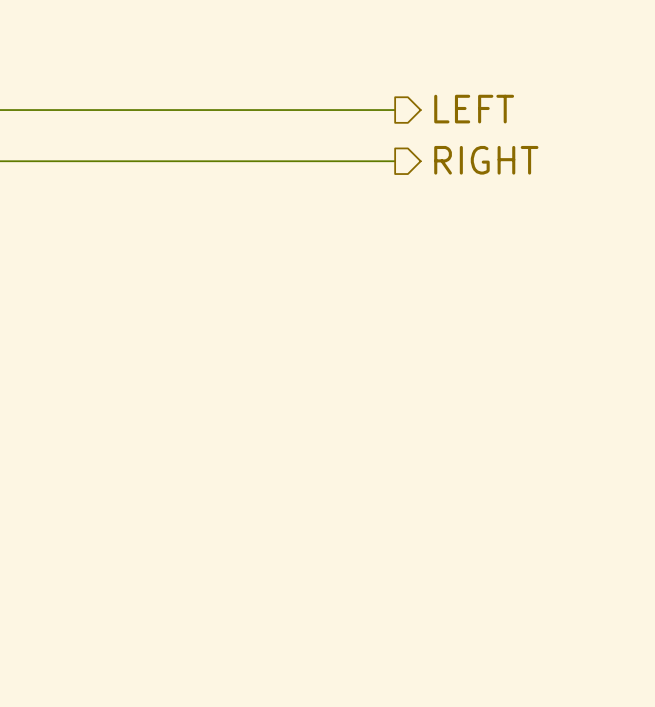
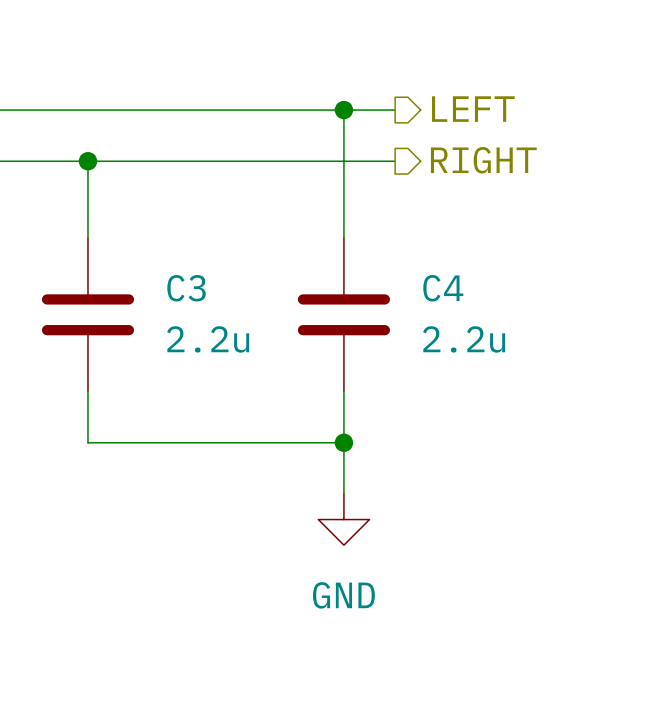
wire: none -> (343, 110) (343, 238)
junction: none -> (343, 110)
wire: none -> (87, 161) (87, 238)
junction: none -> (87, 161)
C3: none -> 2.2u (87, 314)
C4: none -> 2.2u (343, 314)
wire: none -> (87, 391) (87, 442) (343, 442)
wire: none -> (343, 391) (343, 493)
junction: none -> (343, 442)
power symbol: none -> GND (343, 519)

